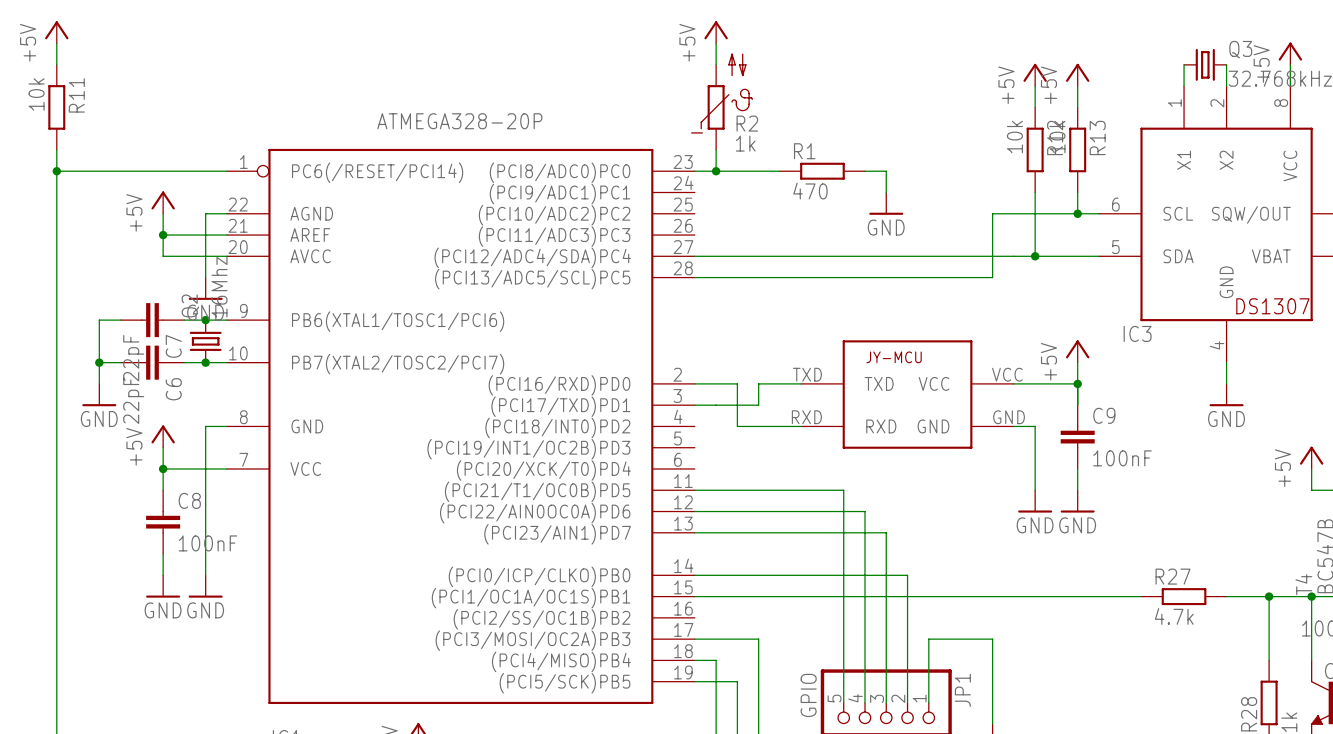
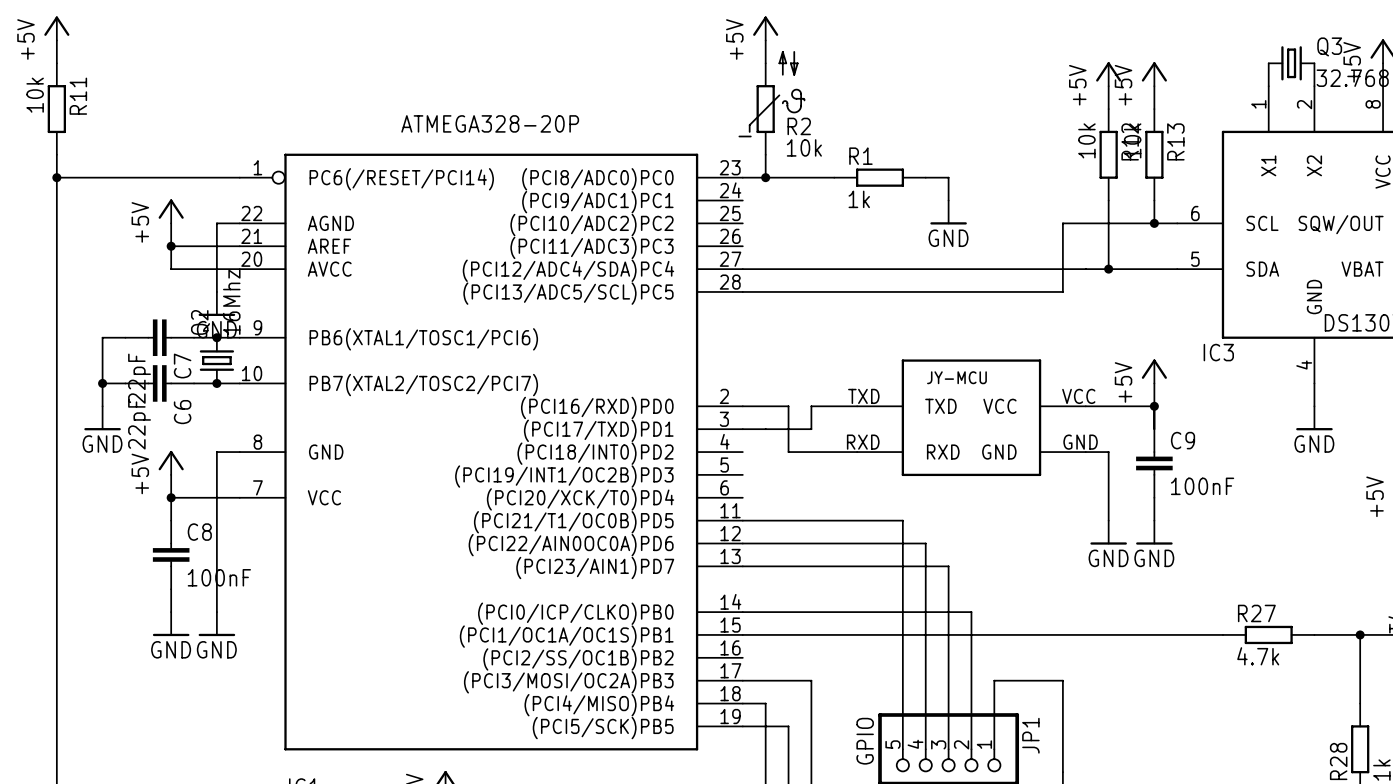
R2 value: 1k (745, 143) -> 10k (804, 147)
R1 value: 470 (810, 191) -> 1k (859, 199)

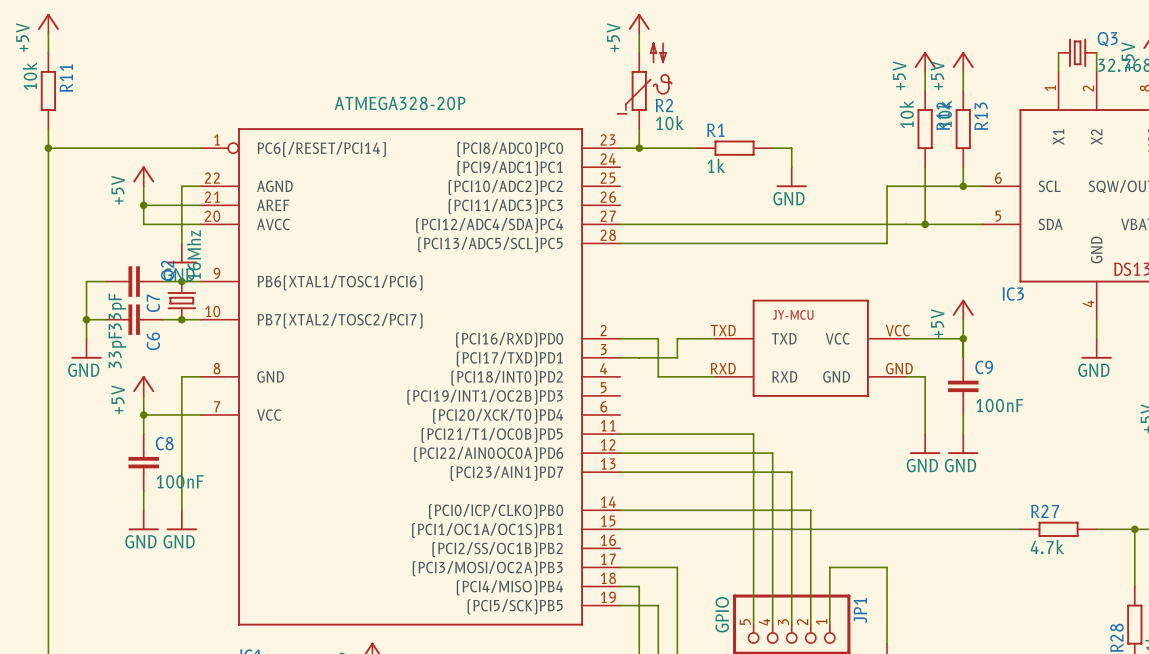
C7 value: 22pF (139, 378) -> 33pF (117, 311)
C6 value: 22pF (139, 424) -> 33pF (117, 349)

